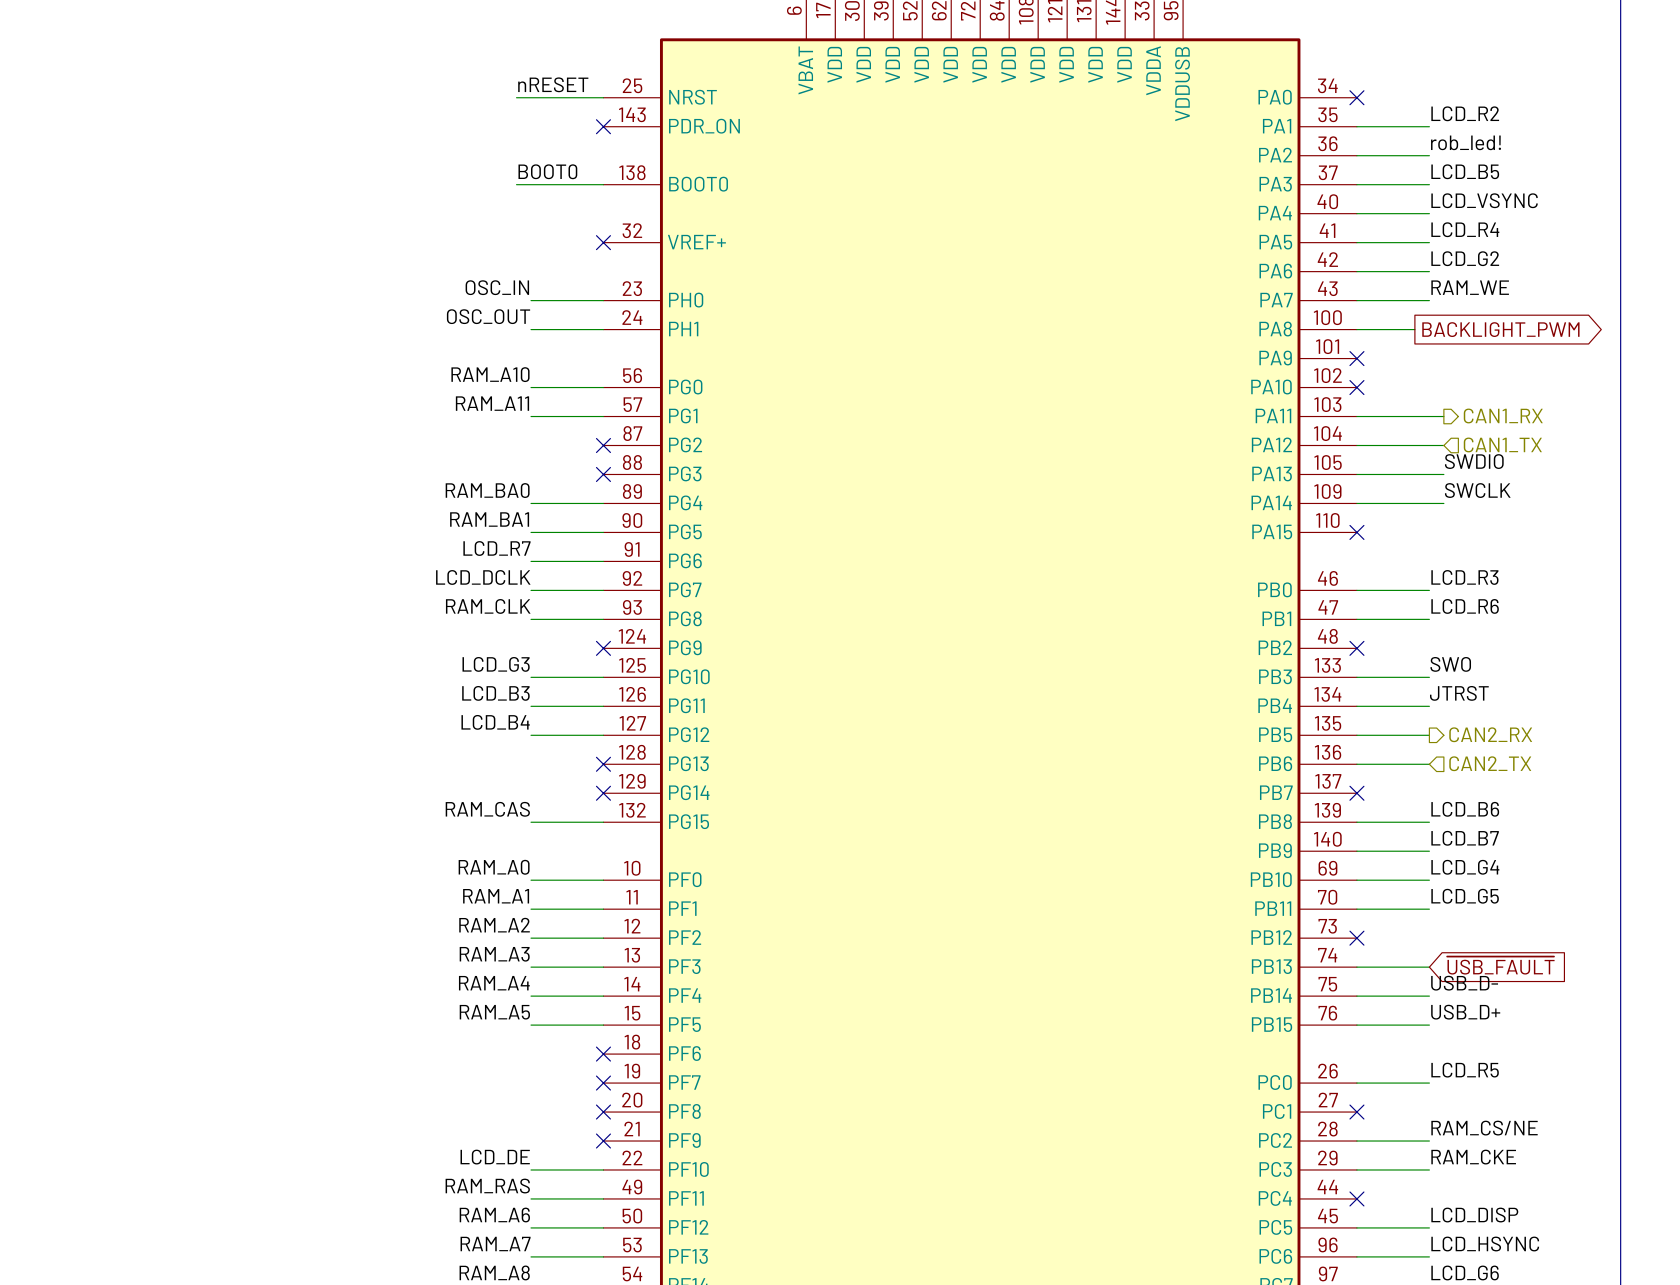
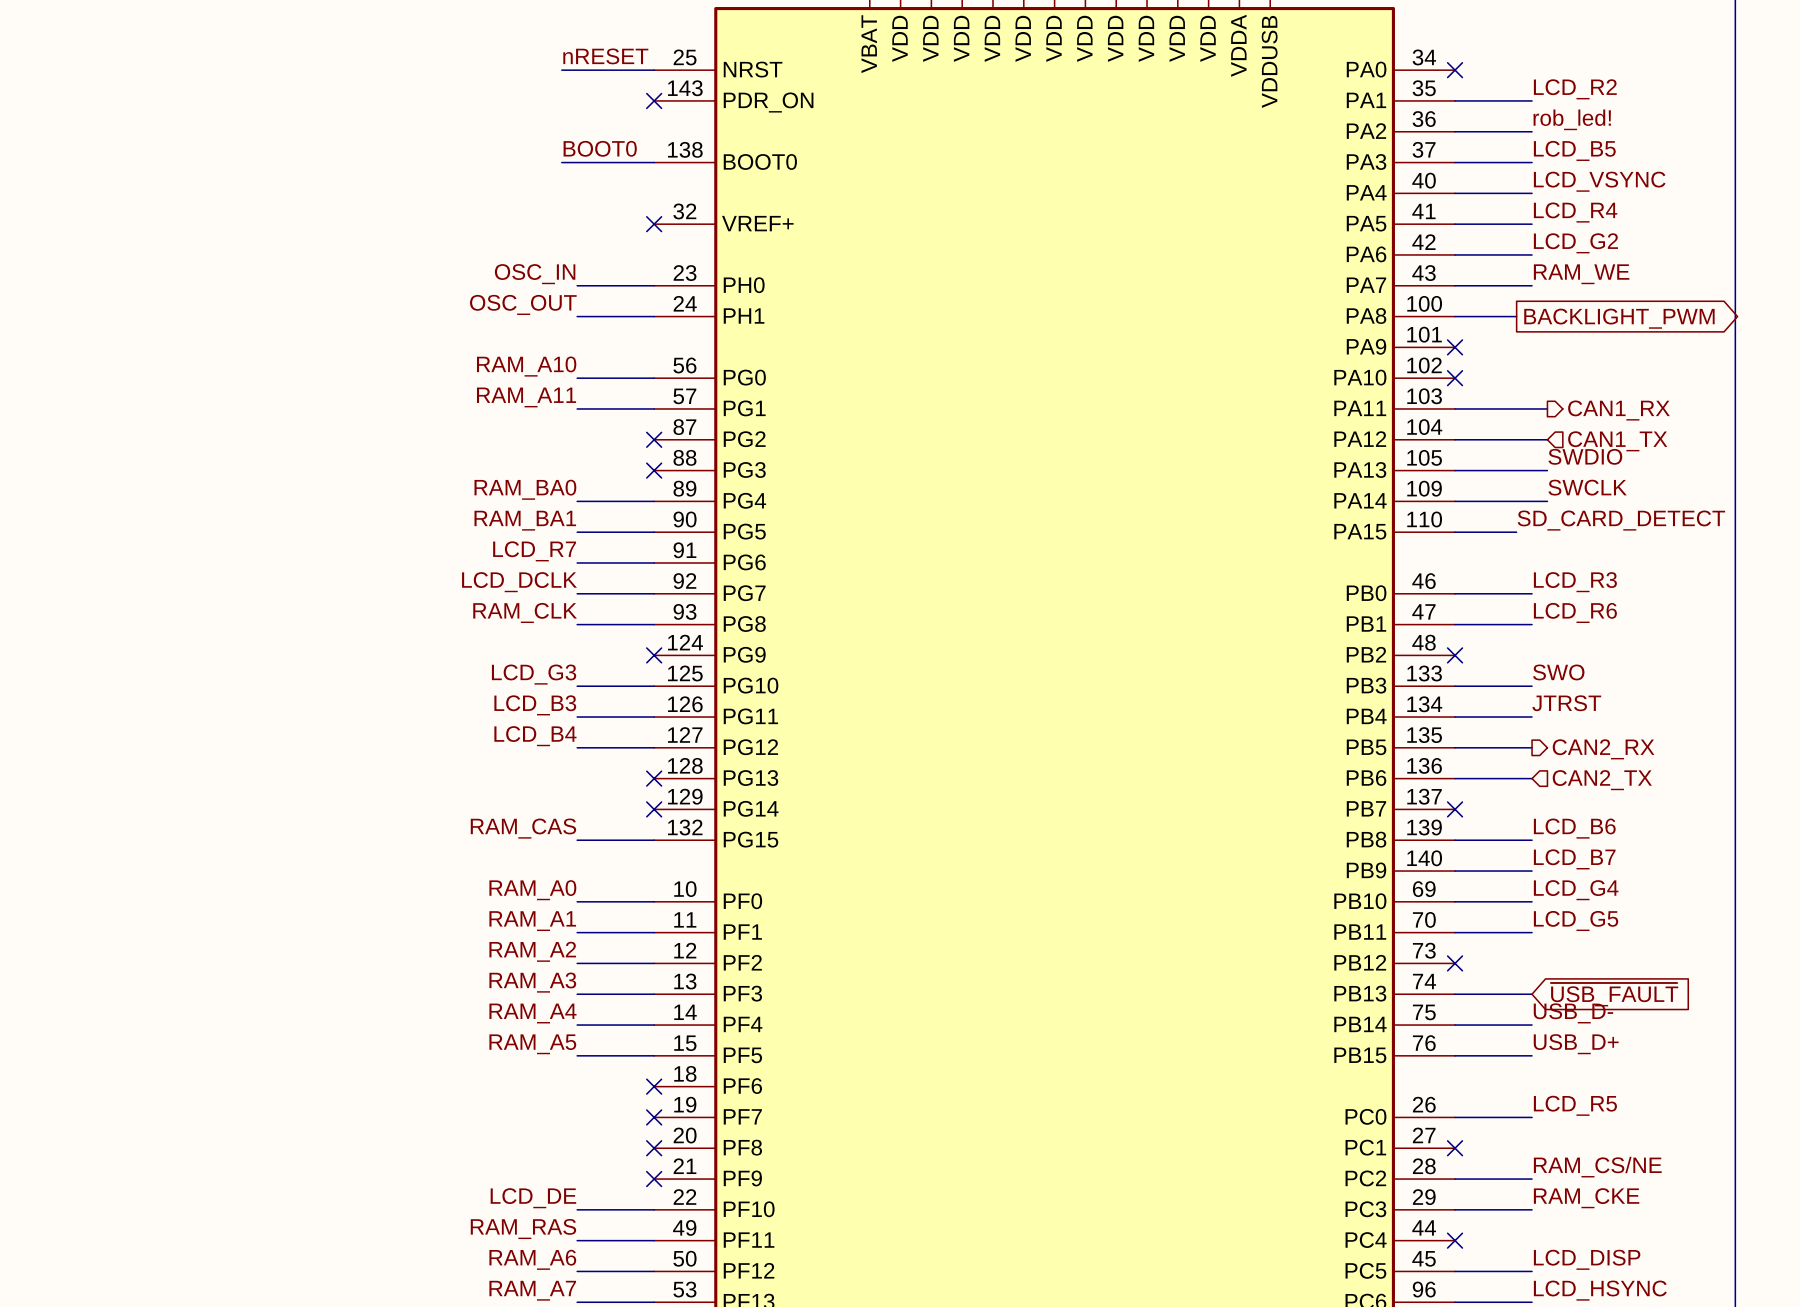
label: none -> SD_CARD_DETECT (1621, 520)
wire: none -> (1455, 532) (1516, 532)
no-connect mark: (1356, 532) -> none

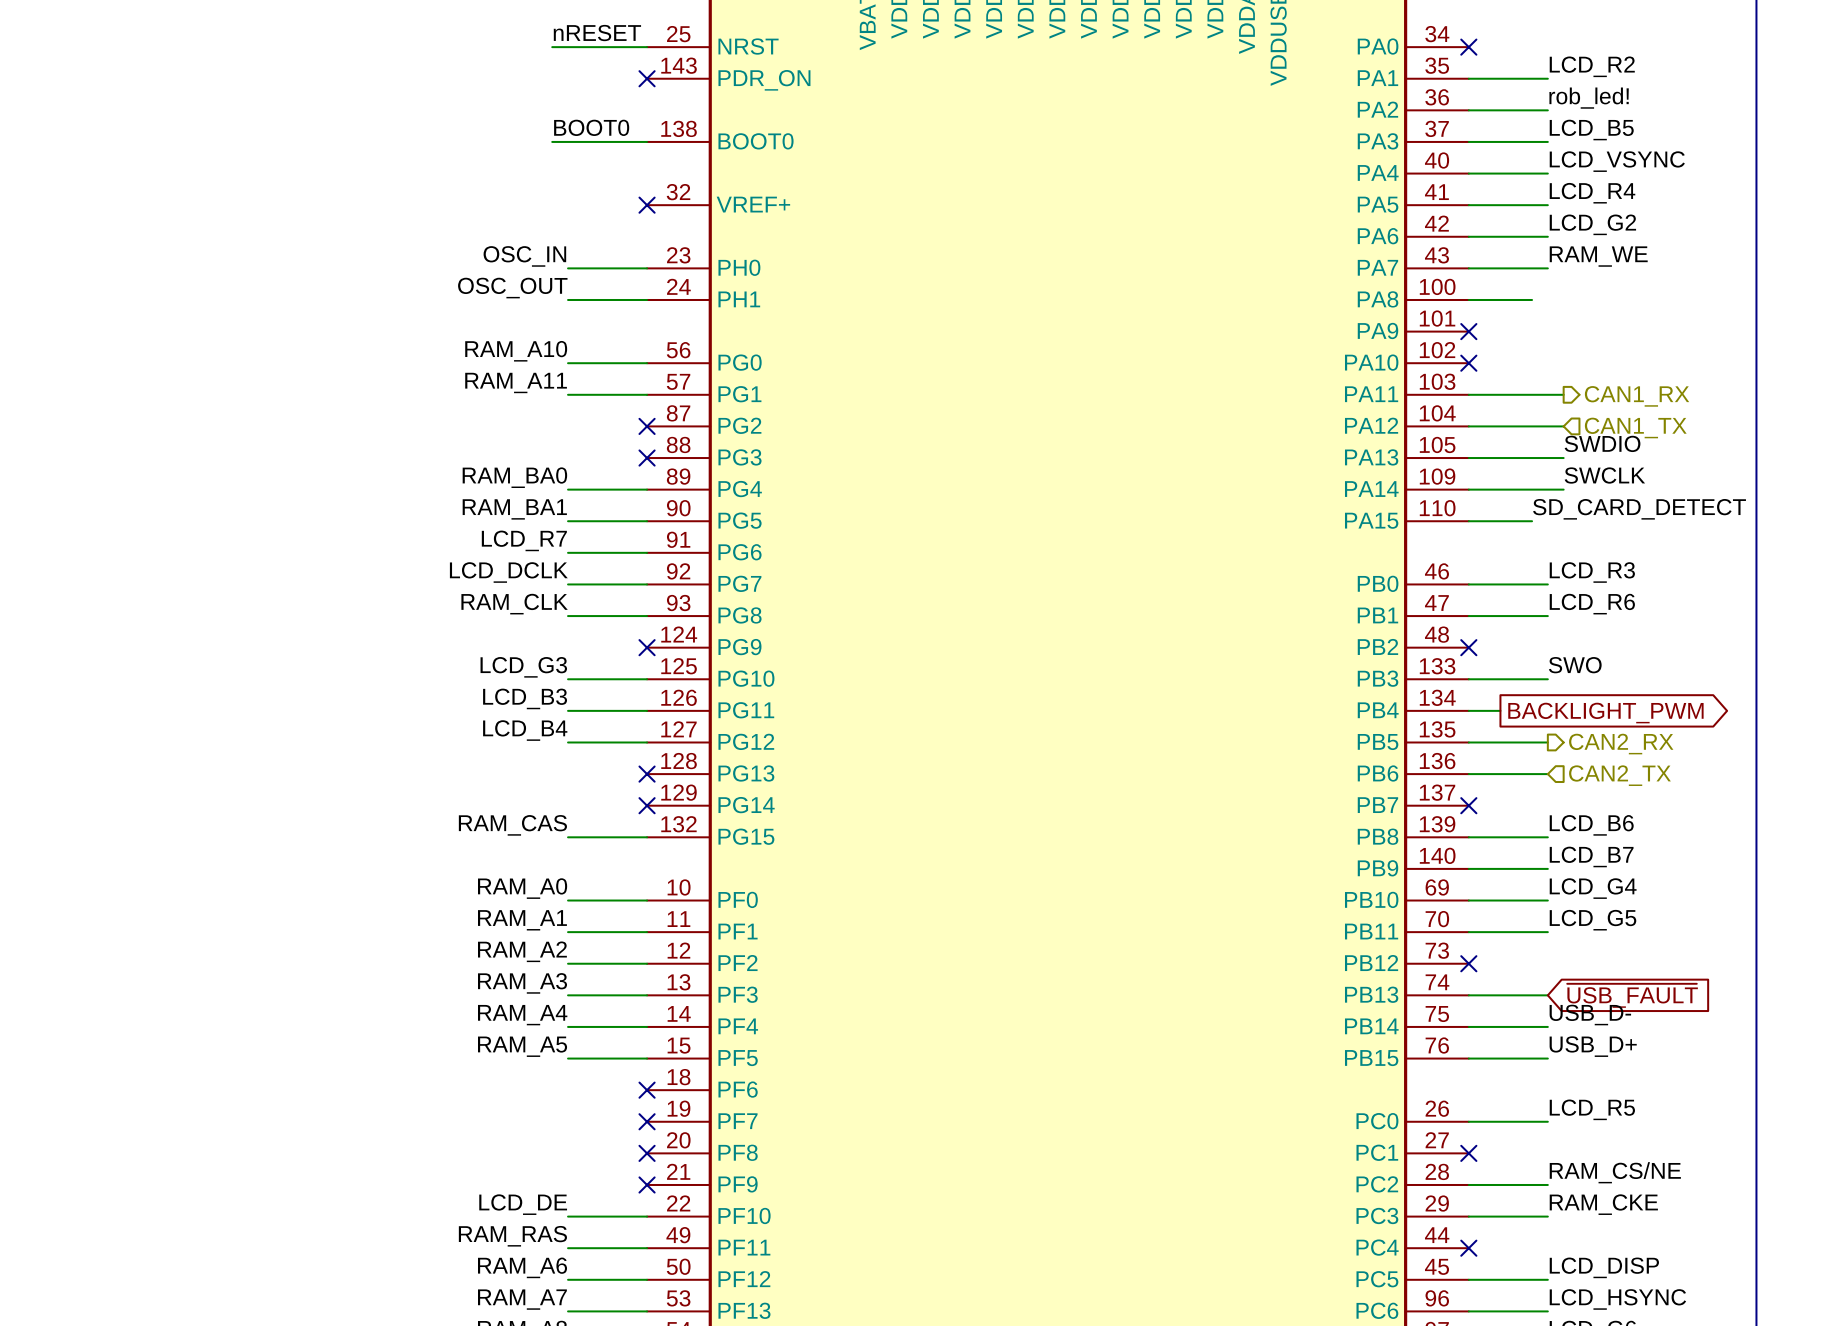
global label: BACKLIGHT_PWM (1619, 318) -> none
label: JTRST (1566, 703) -> none
wire: (1485, 717) (1532, 717) -> none
global label: none -> BACKLIGHT_PWM (1605, 713)

